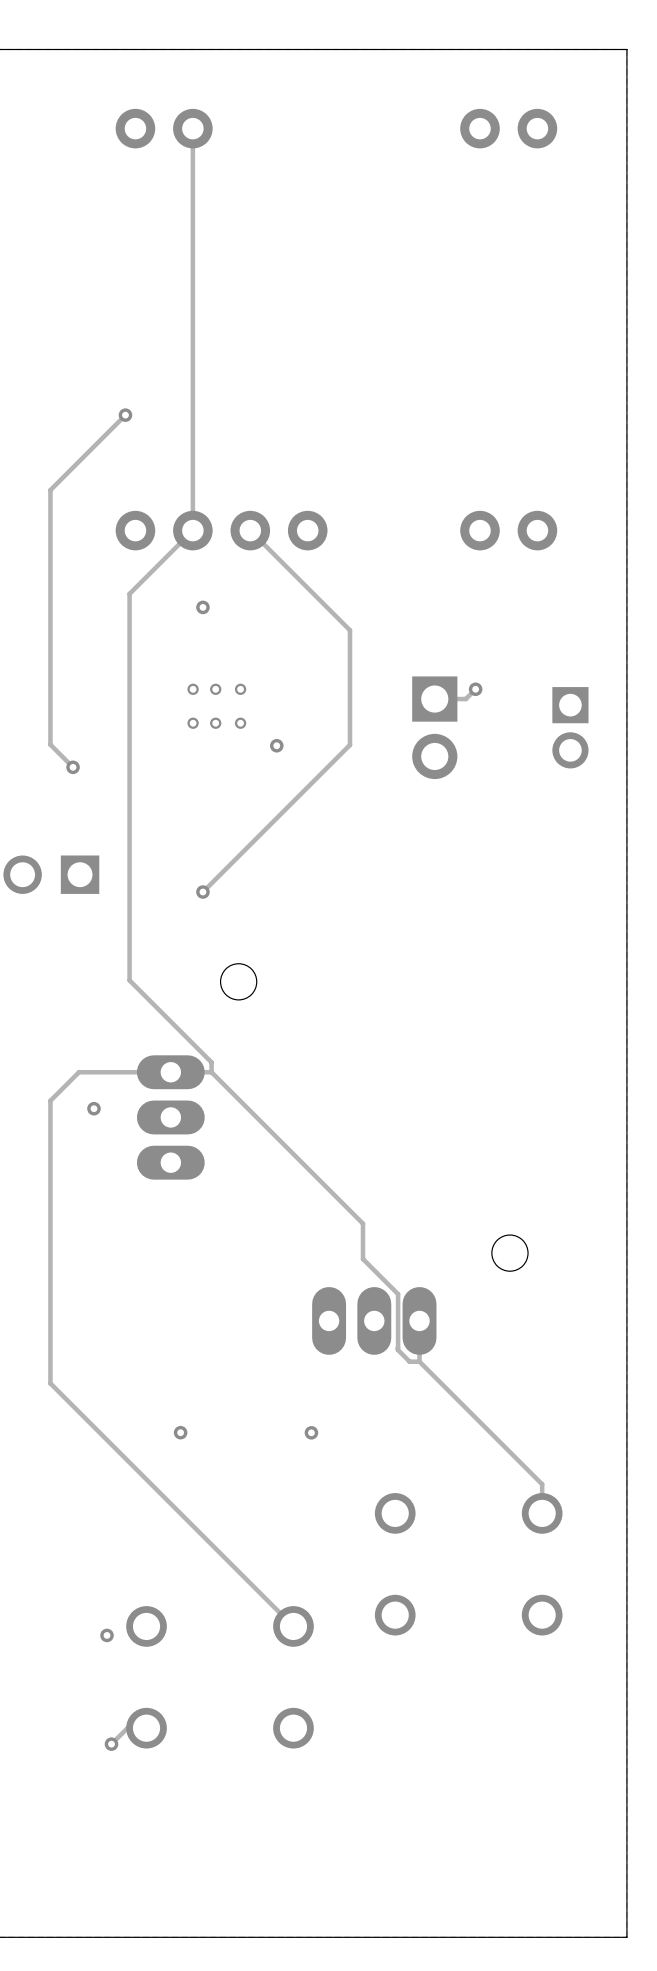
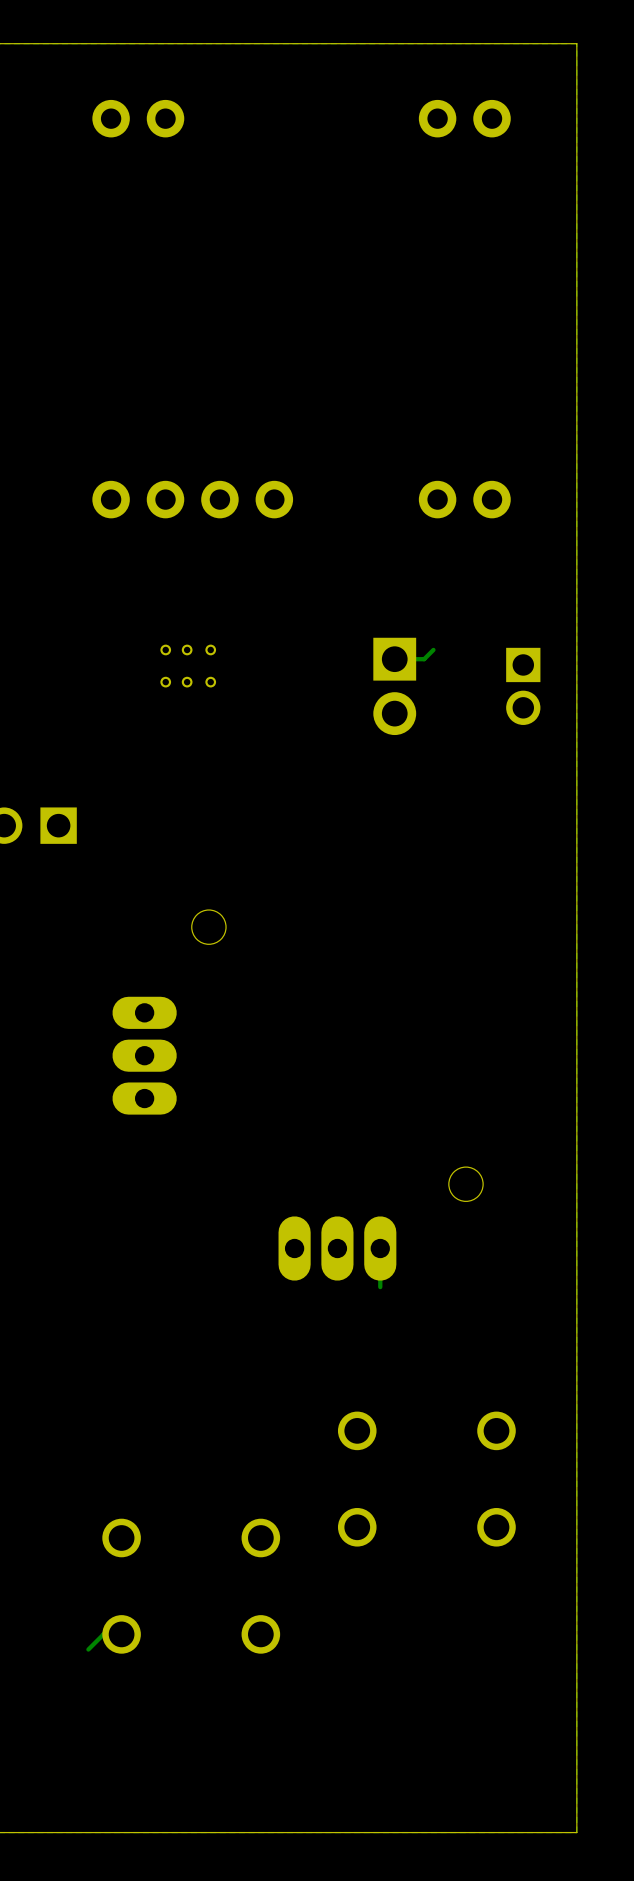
track: (192, 128) (192, 530) (129, 593) (129, 980) (211, 1062) (211, 1072) -> none
track: (125, 415) (50, 490) (50, 744) (73, 767) -> none
via: (125, 415) -> none
track: (250, 530) (350, 630) (350, 744) (202, 892) -> none
via: (202, 607) -> none
via: (475, 689) -> none
via: (276, 745) -> none
via: (73, 767) -> none
via: (202, 892) -> none
track: (211, 1072) (362, 1223) (362, 1259) (398, 1294) (398, 1347) -> none
track: (211, 1072) (78, 1072) (50, 1100) (50, 1383) (293, 1626) -> none
via: (93, 1108) -> none
track: (397, 1348) (409, 1361) (419, 1361) (542, 1484) (542, 1513) -> none
via: (180, 1432) -> none
via: (311, 1432) -> none
via: (107, 1635) -> none
via: (111, 1744) -> none

